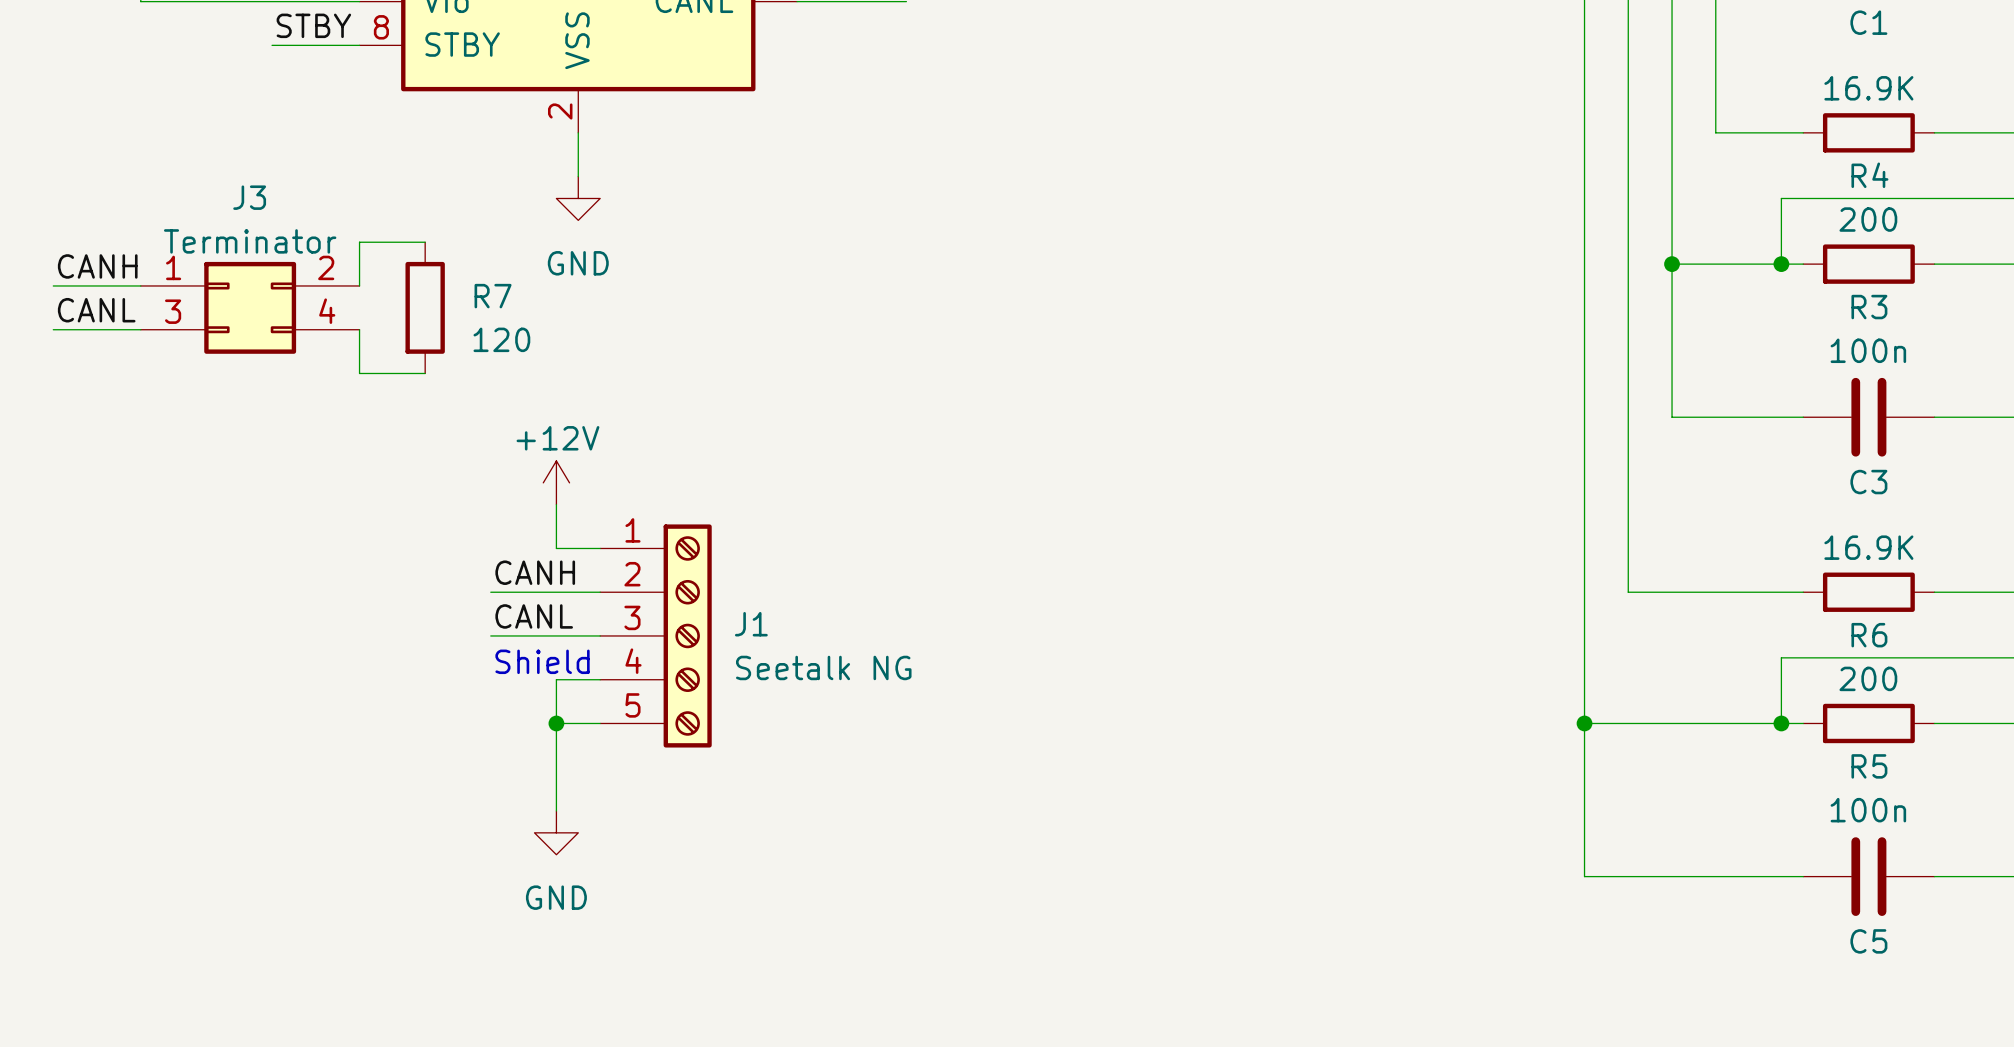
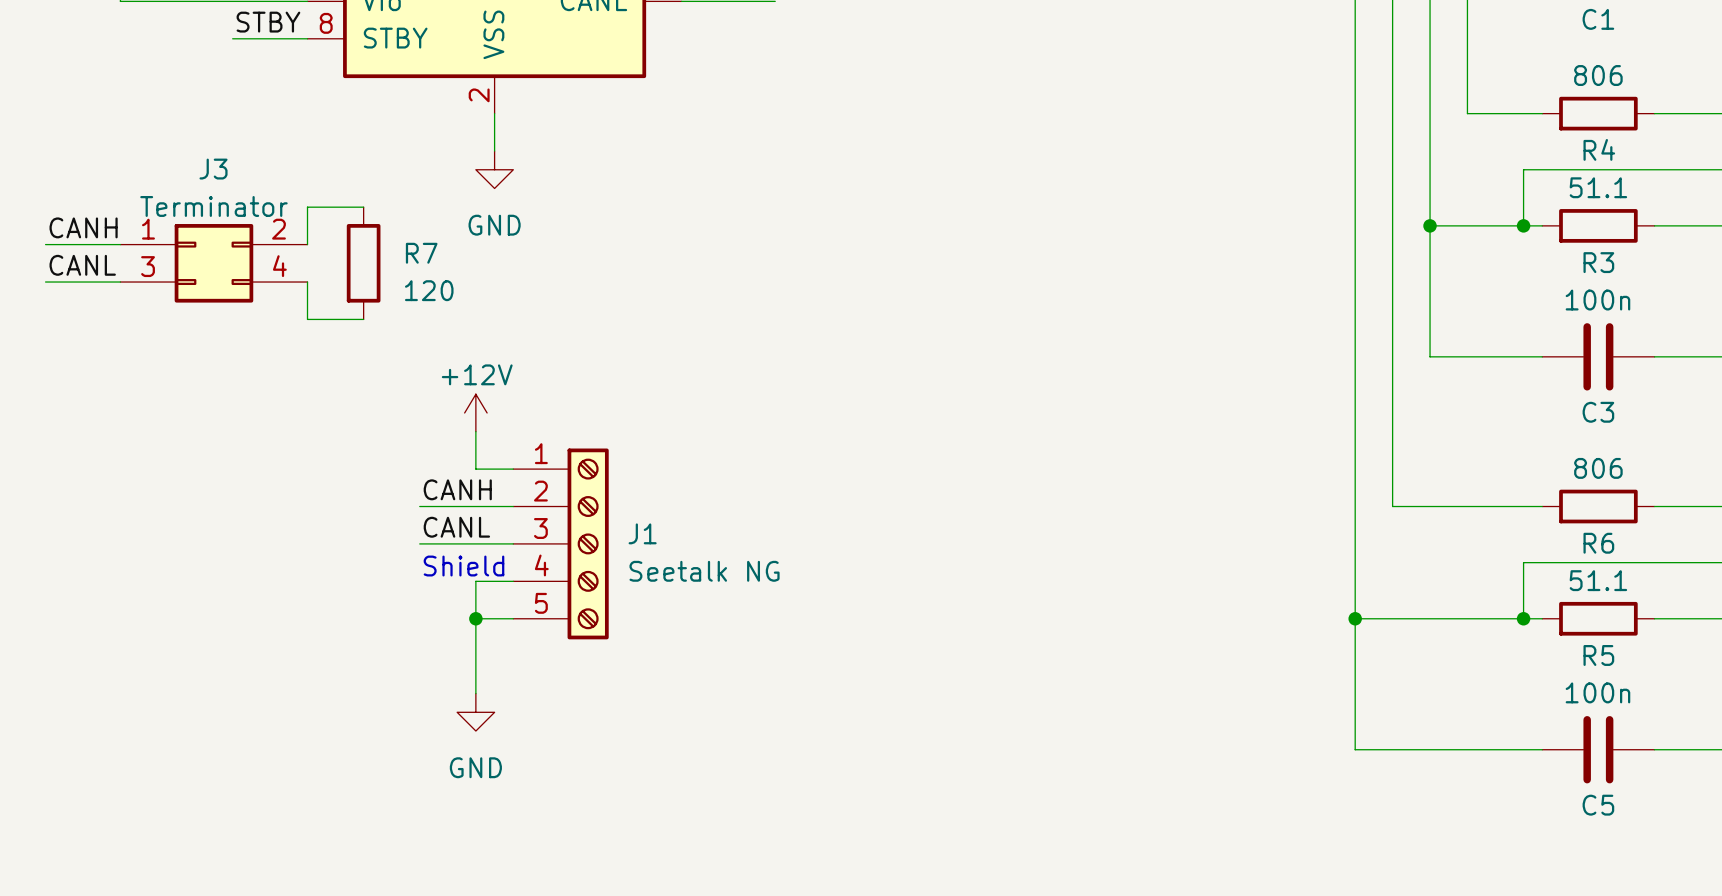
R4 value: 16.9K (1868, 88) -> 806 (1598, 75)
R3 value: 200 (1868, 219) -> 51.1 (1598, 187)
R6 value: 16.9K (1868, 547) -> 806 (1598, 468)
R5 value: 200 (1868, 678) -> 51.1 (1598, 580)

